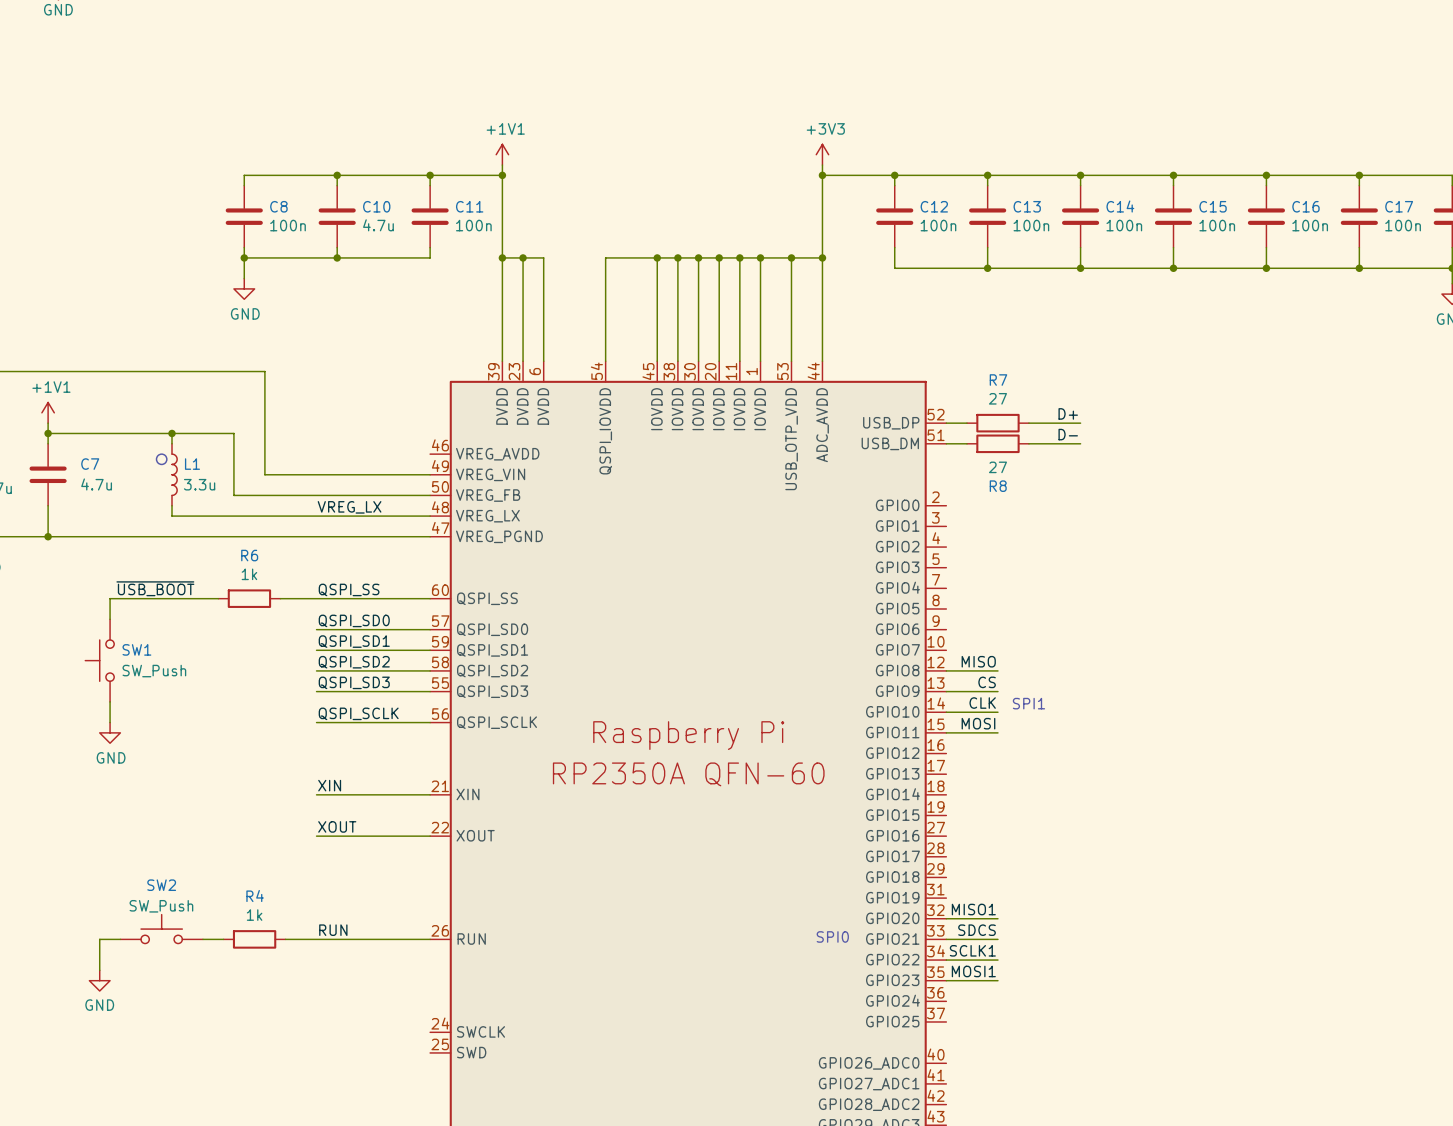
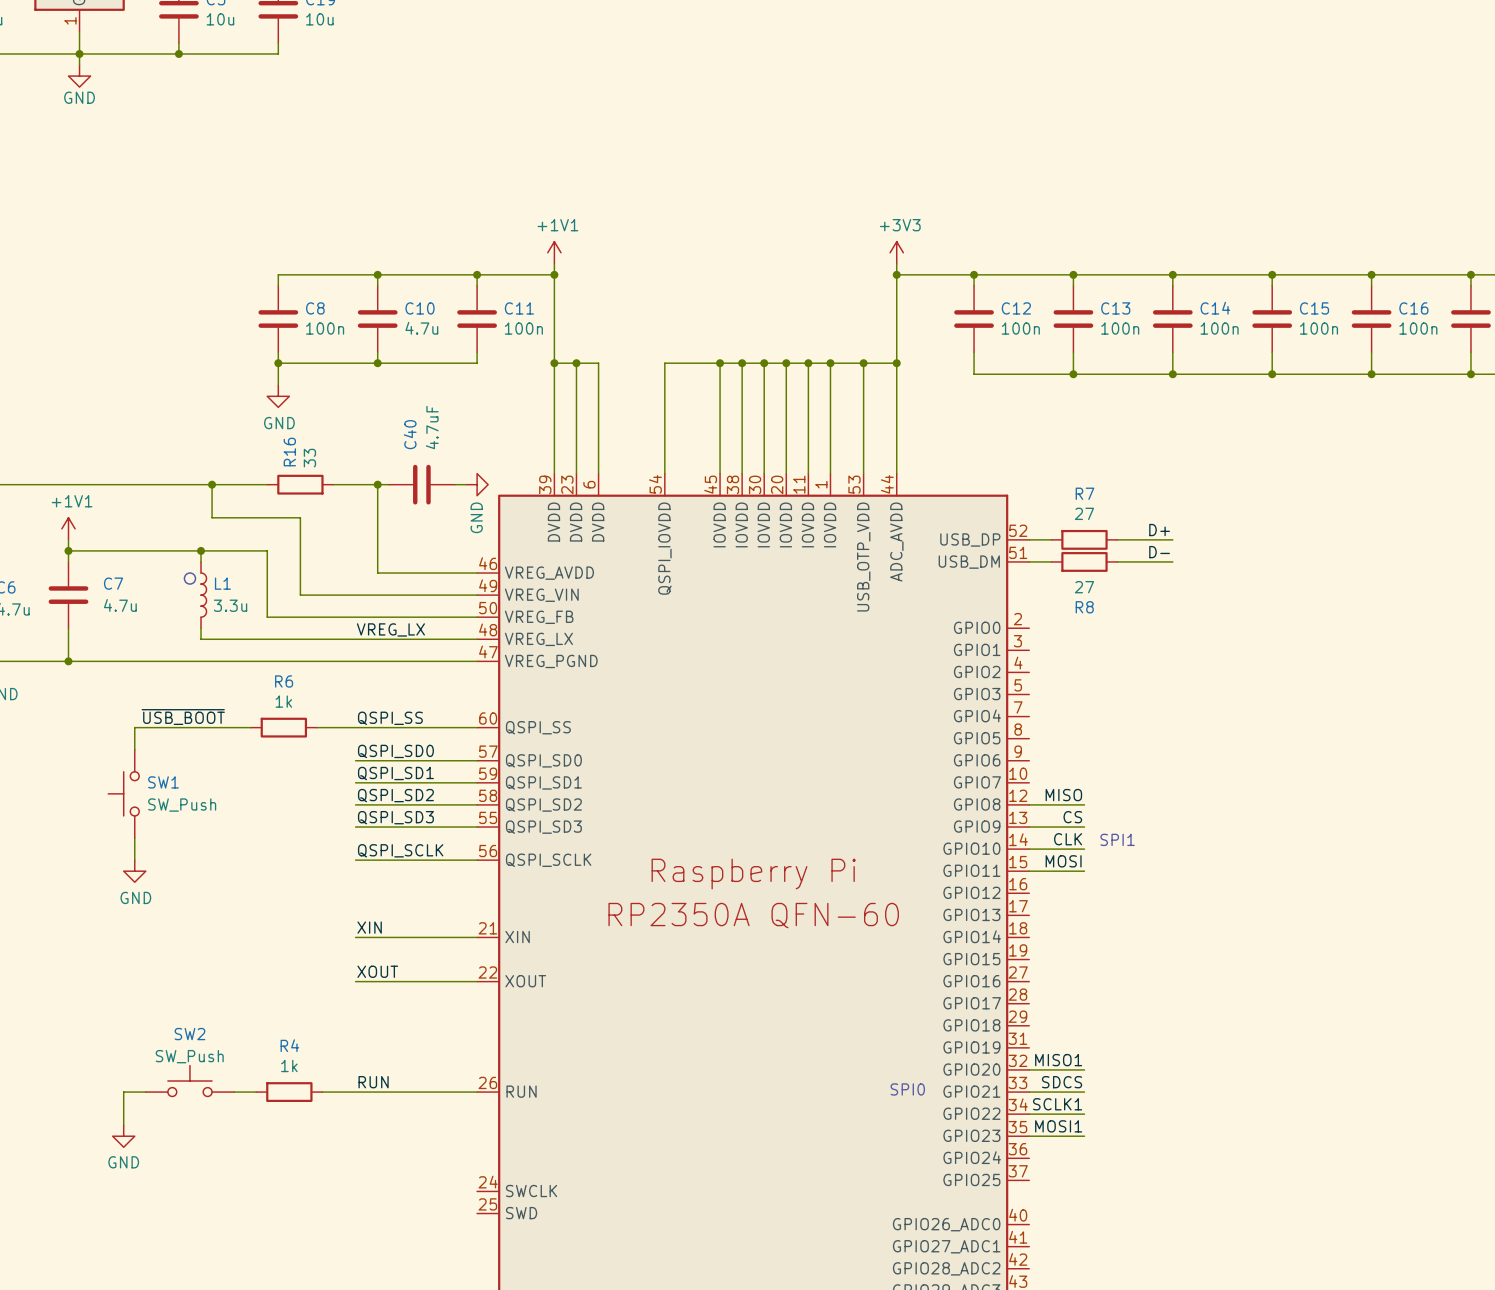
junction: none -> (212, 484)
wire: (233, 371) (264, 371) (264, 402) -> (212, 484) (212, 517) (300, 517)
R16: none -> 33 (300, 484)
wire: none -> (333, 484) (388, 484)
wire: none -> (377, 484) (377, 573) (477, 573)
junction: none -> (377, 484)
C40: none -> 4.7uF (421, 484)
wire: none -> (455, 484) (466, 484)
power symbol: none -> GND (477, 484)

